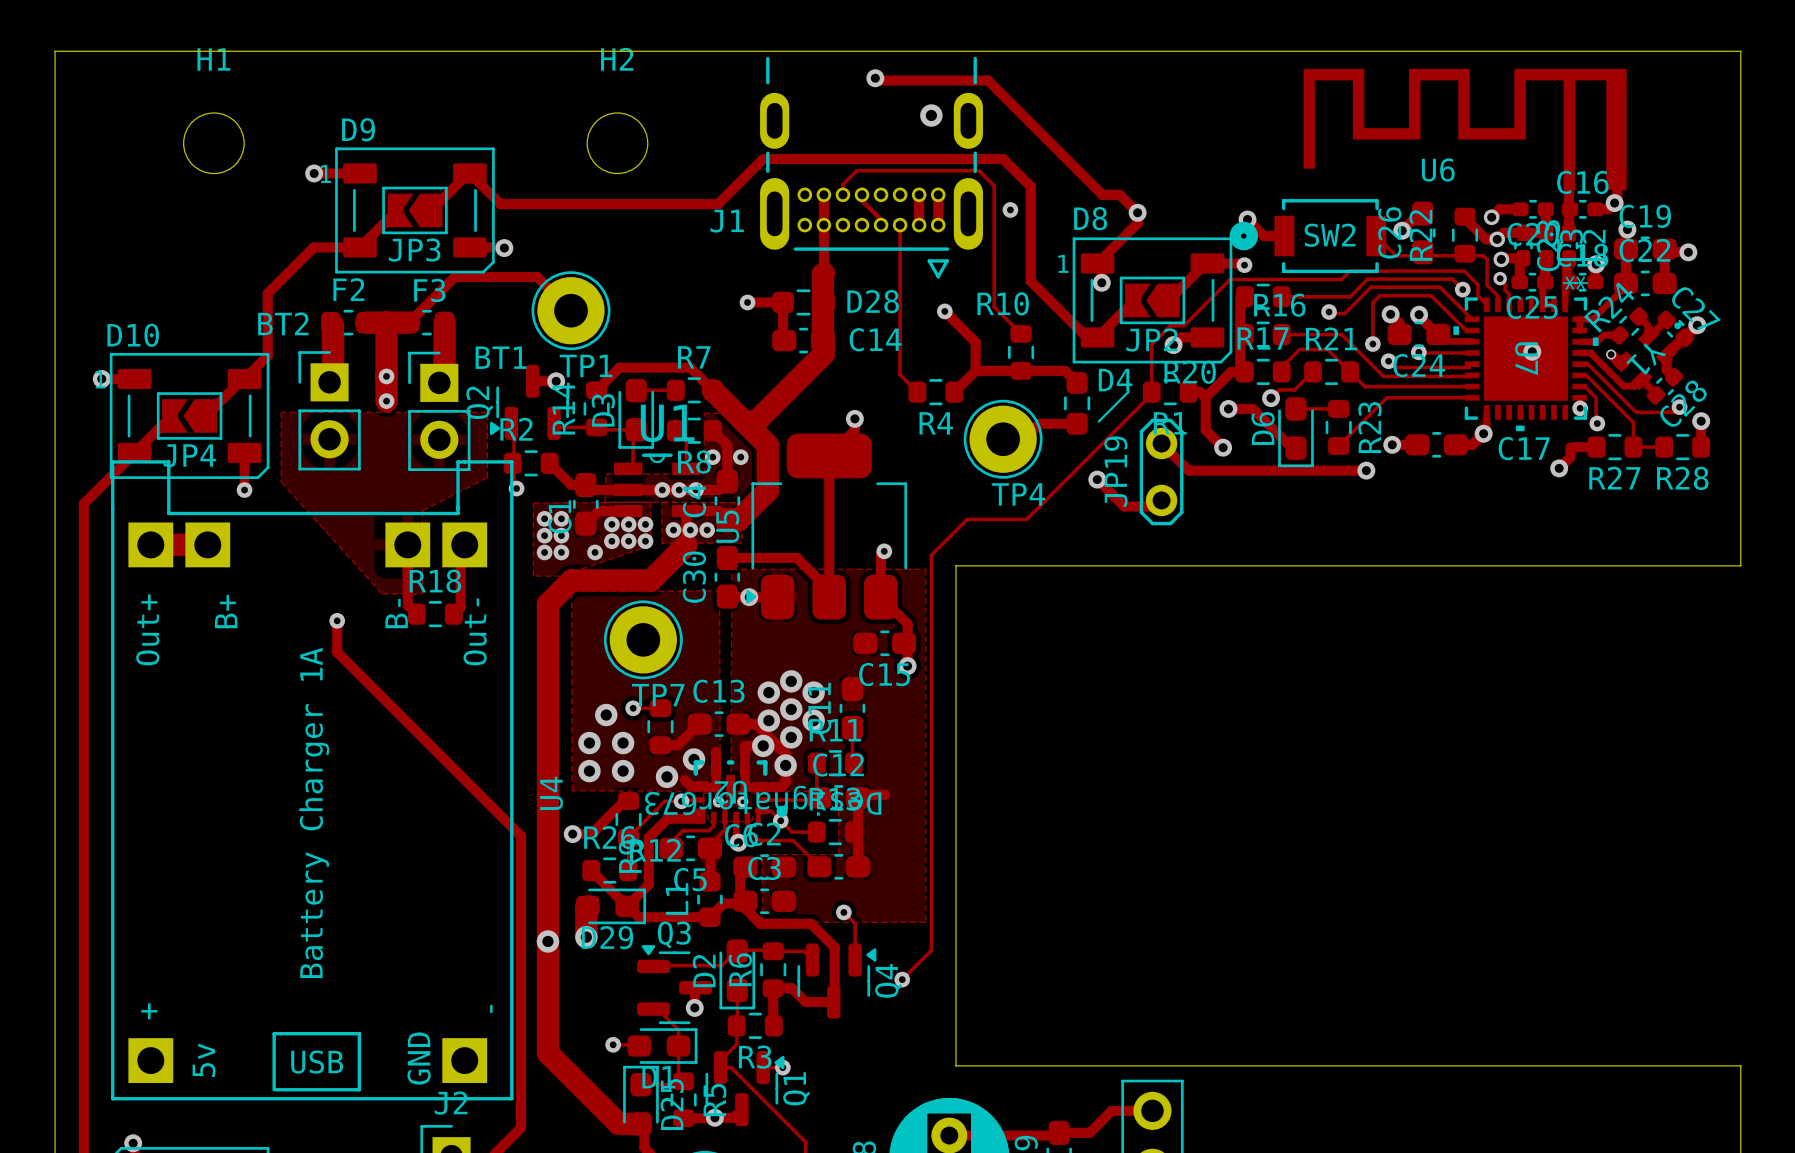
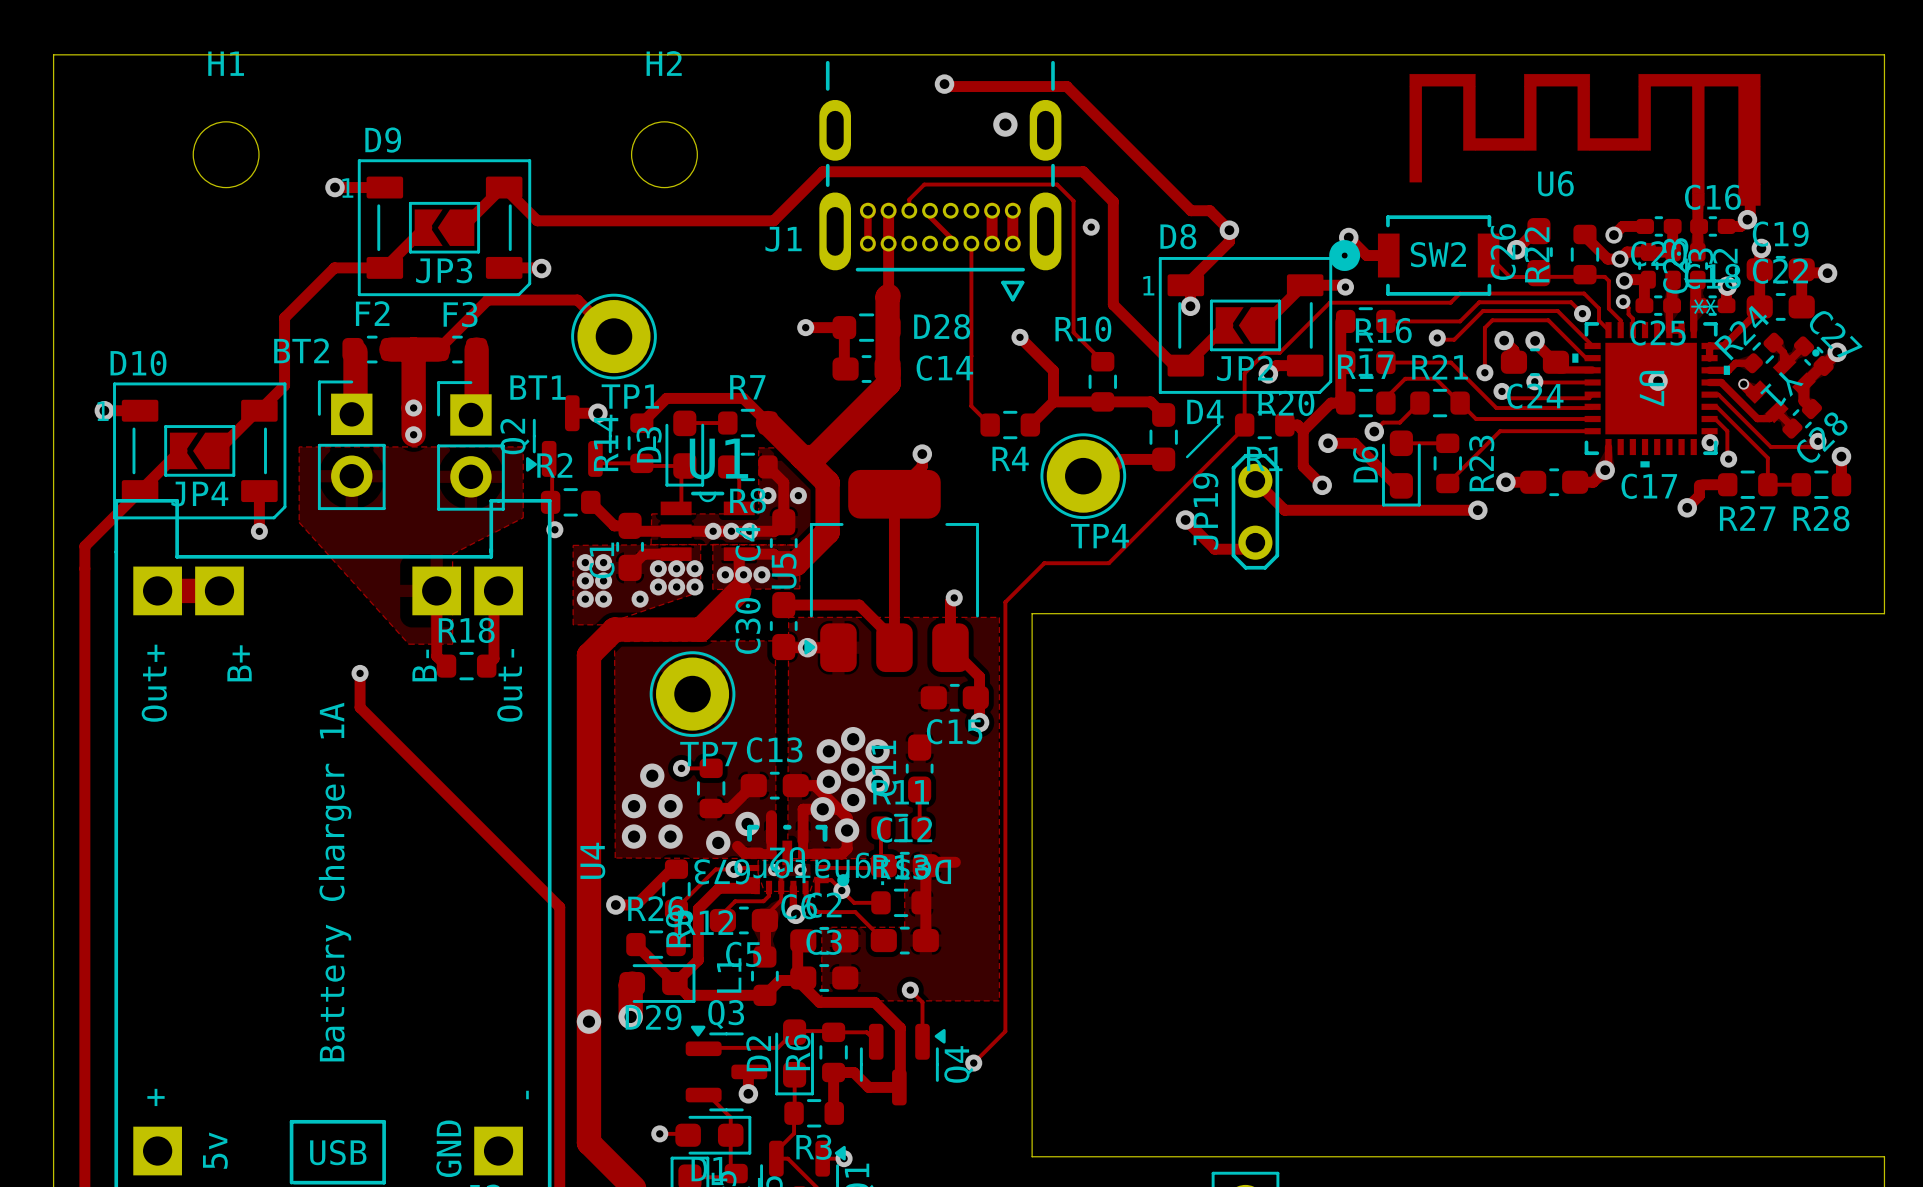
J1 footprint: [760, 56, 983, 279] -> [819, 60, 1062, 302]

